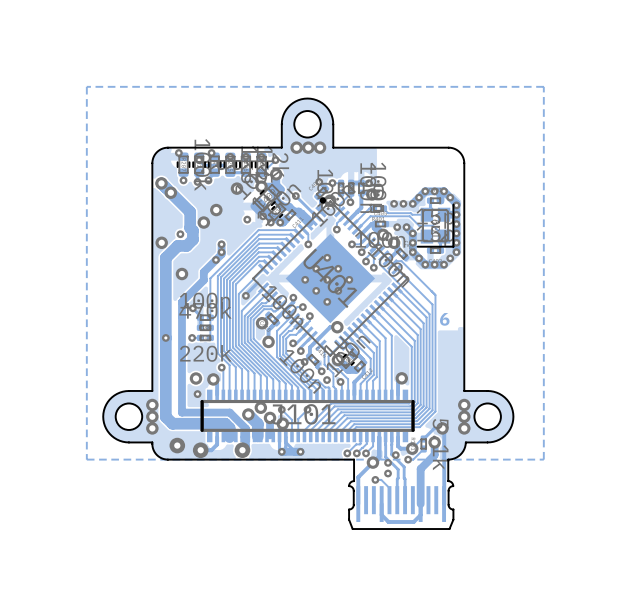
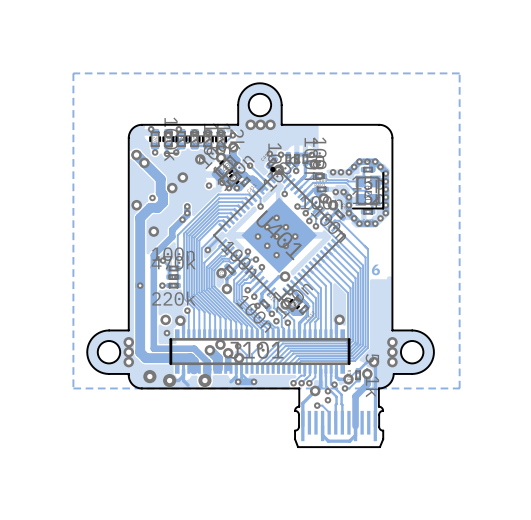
track: none -> (183, 375) (183, 380) (188, 385)
track: none -> (236, 376) (230, 381)

